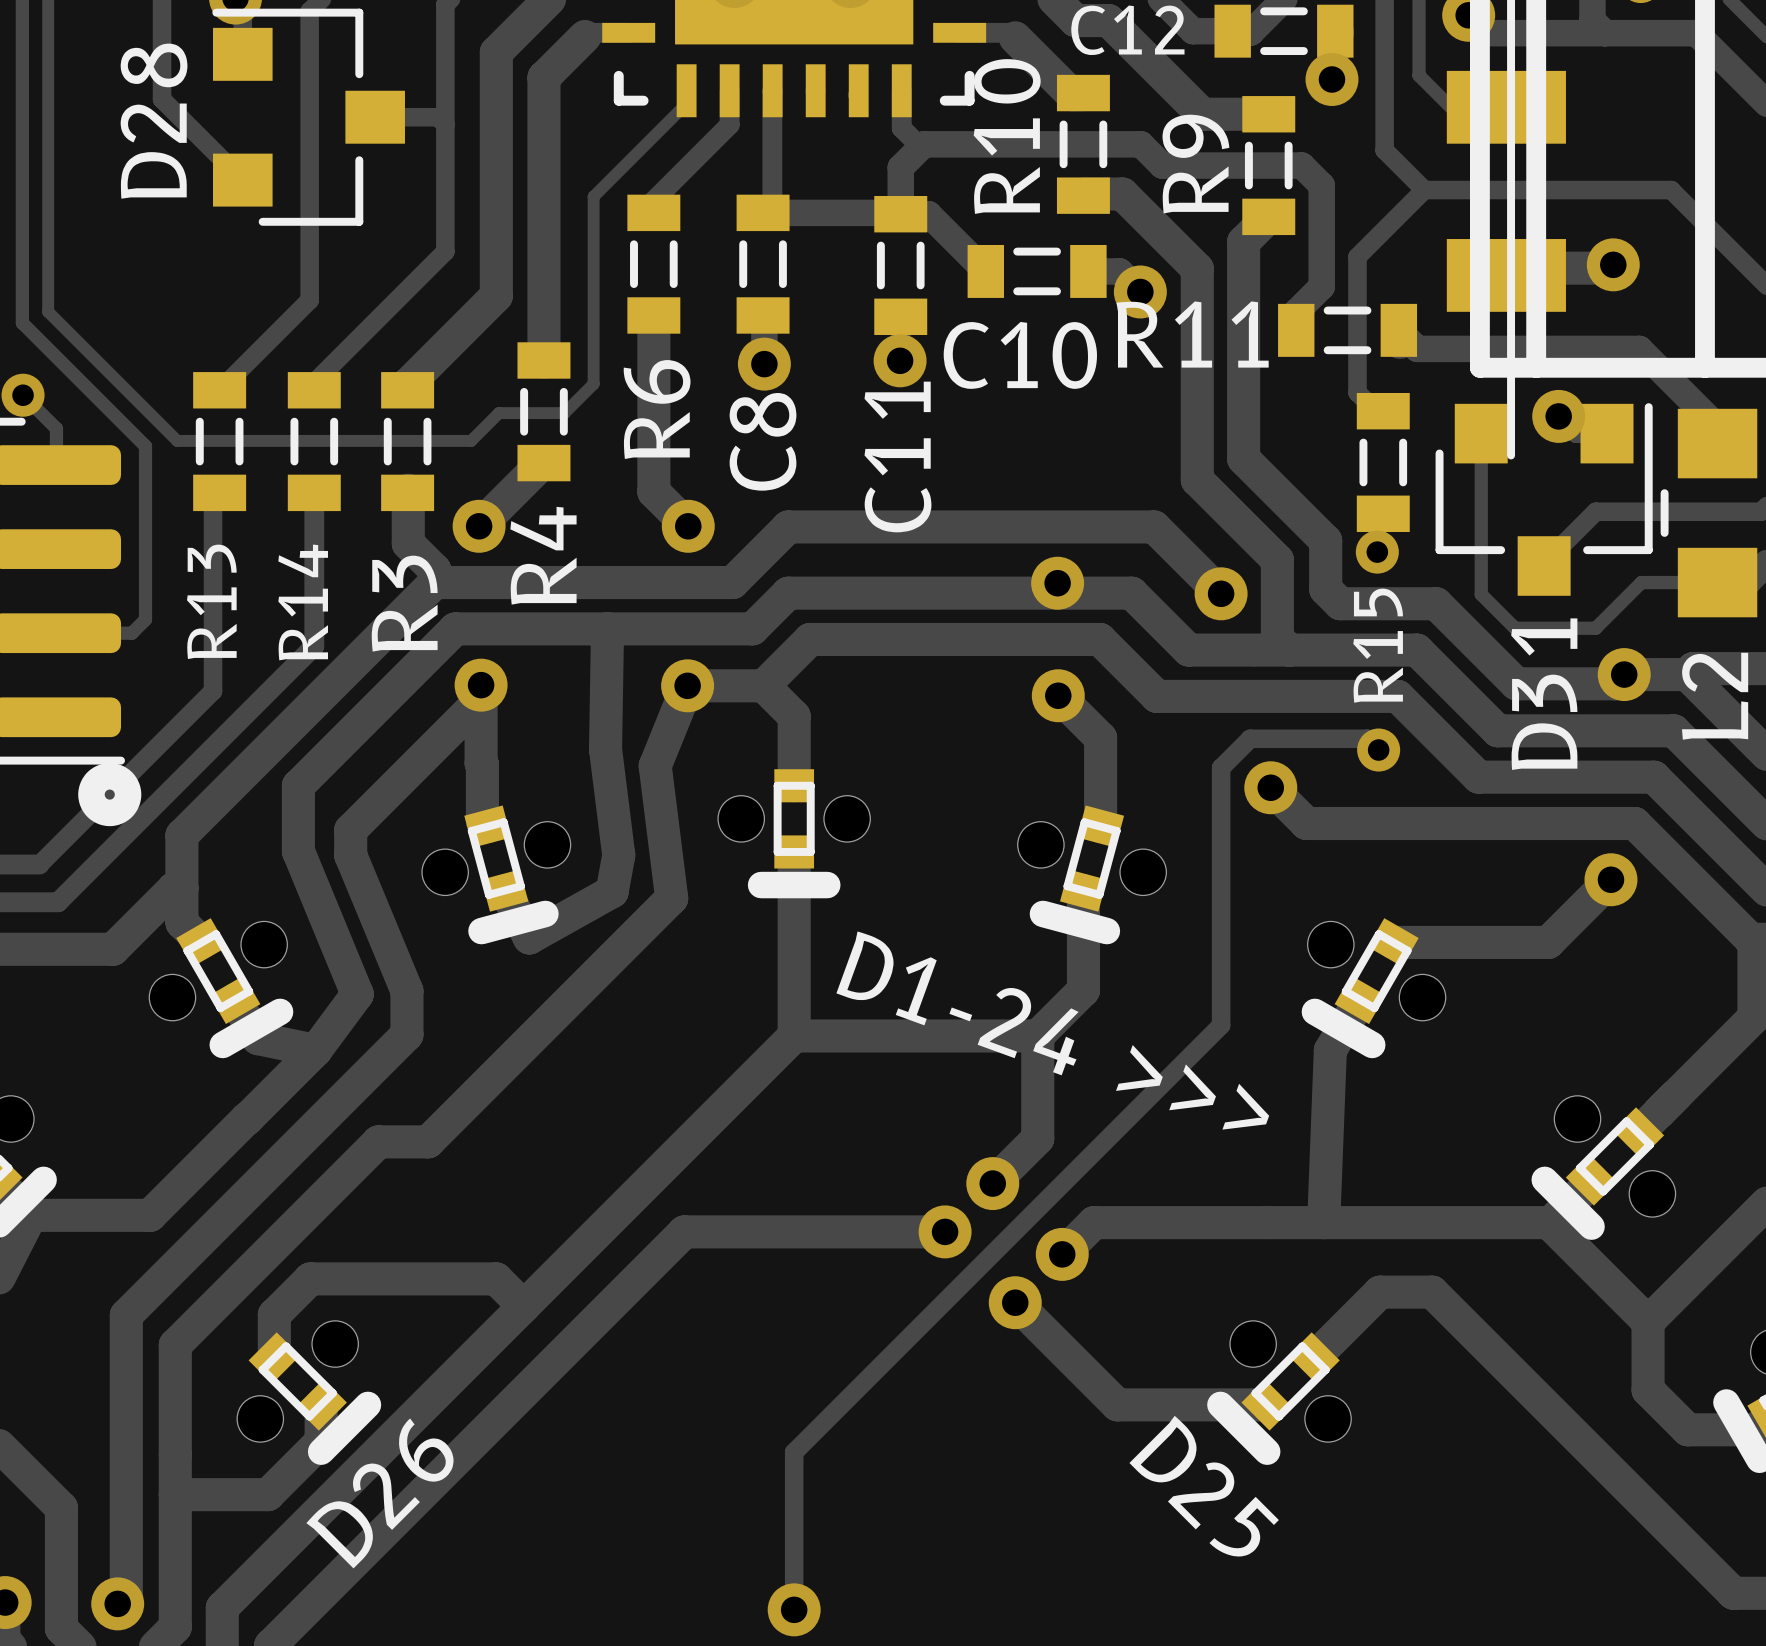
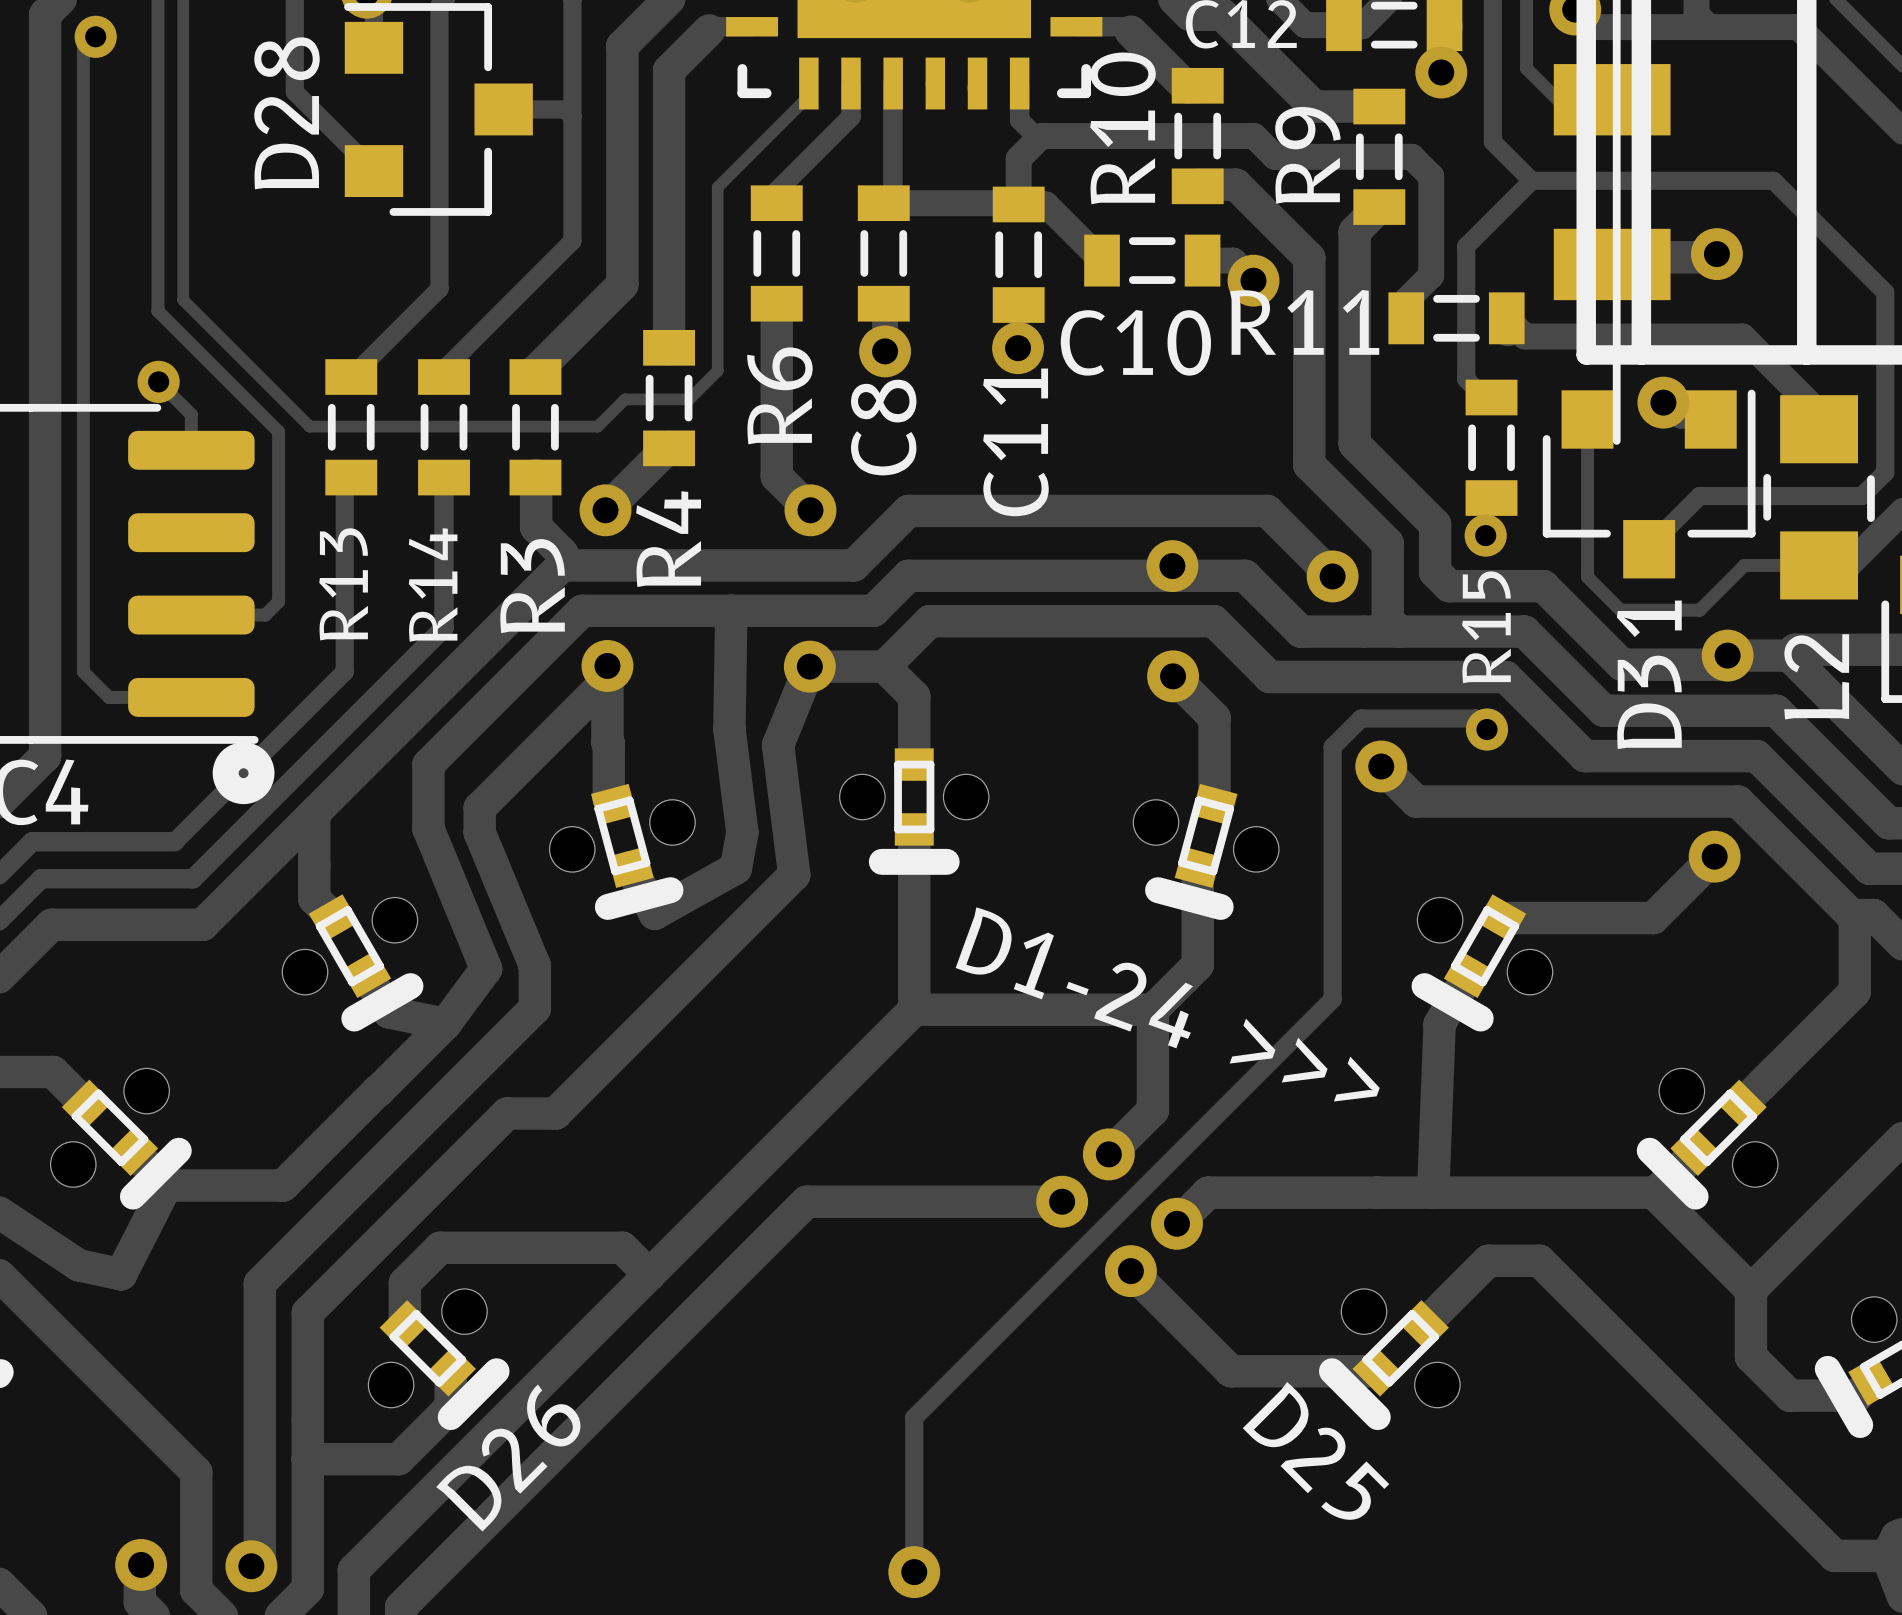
track: (181, 888) (173, 888) (113, 949) (68, 949) -> (314, 813) (202, 924)

